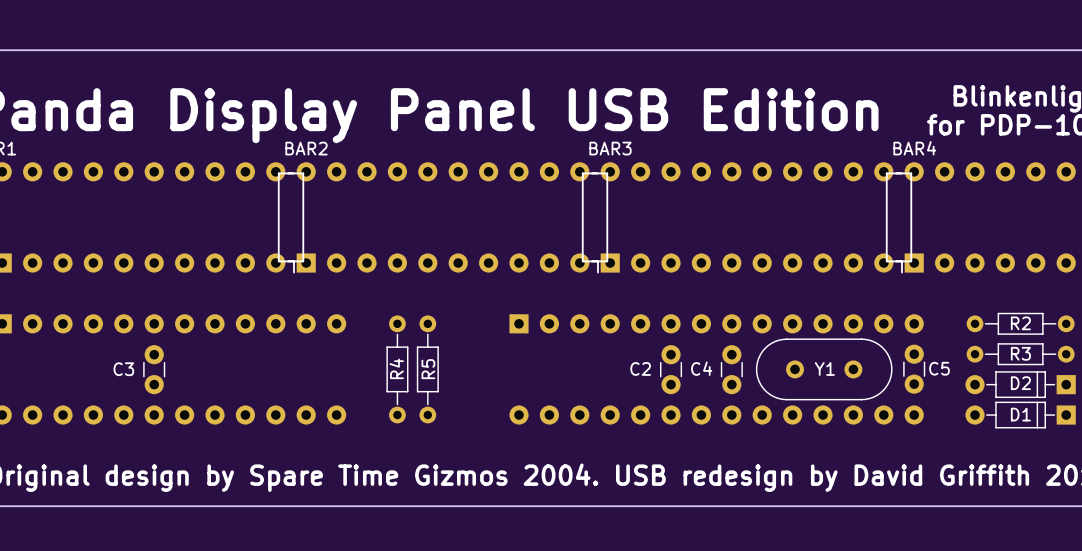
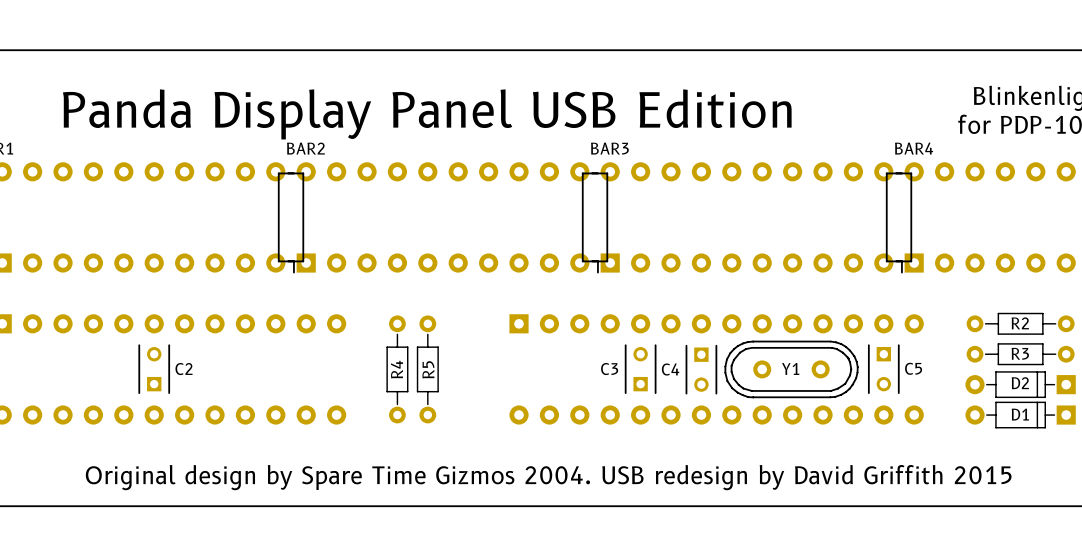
Y1 footprint: [755, 338, 893, 401] -> [724, 340, 859, 399]
C5 footprint: [903, 344, 926, 394] -> [867, 344, 900, 395]
C3 footprint: [143, 345, 166, 395] -> [624, 344, 657, 395]
C2 footprint: [660, 345, 683, 395] -> [138, 344, 171, 395]
C4 footprint: [720, 345, 743, 395] -> [685, 344, 718, 395]
C2 name position: C2 (640, 368) -> C2 (184, 369)

